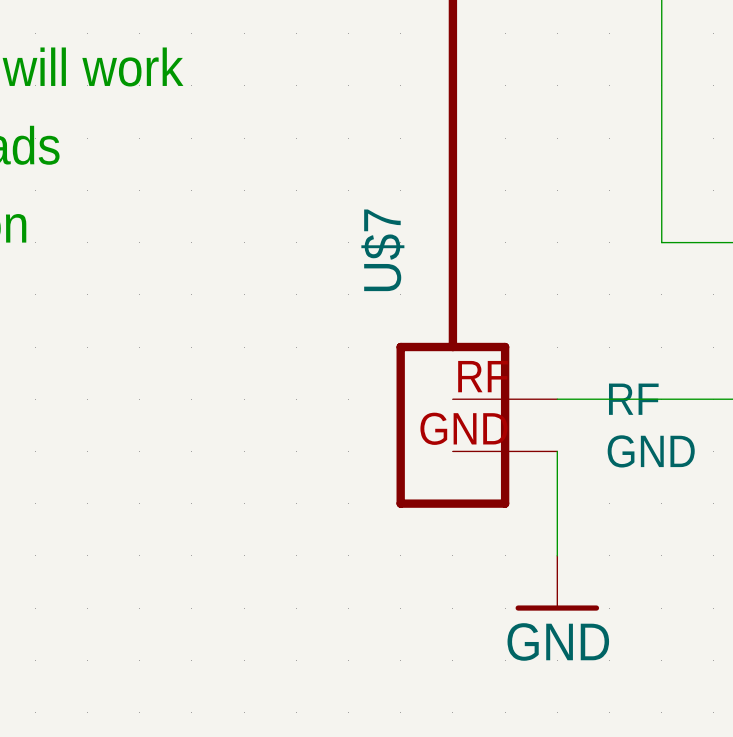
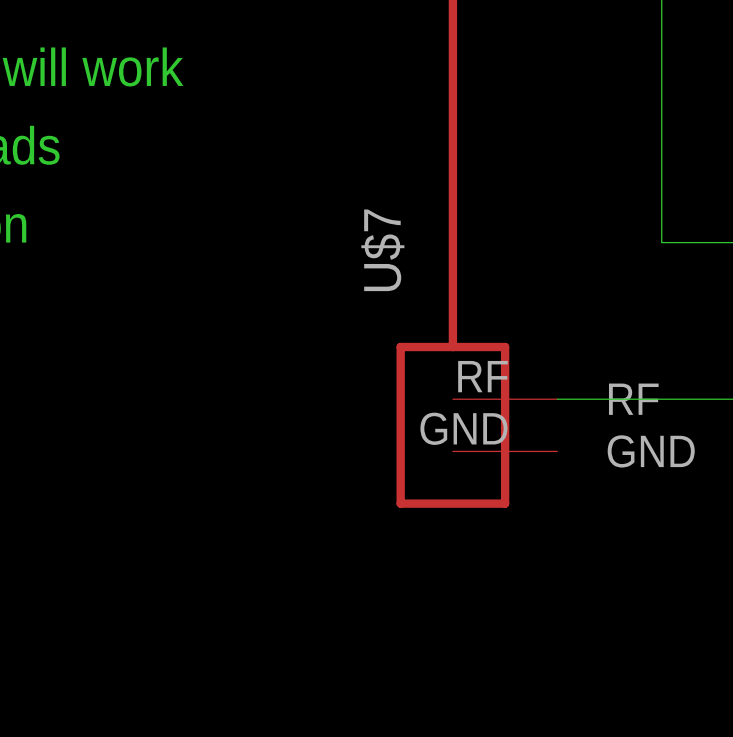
wire: (557, 451) (557, 555) -> none
power symbol: GND (557, 583) -> none

